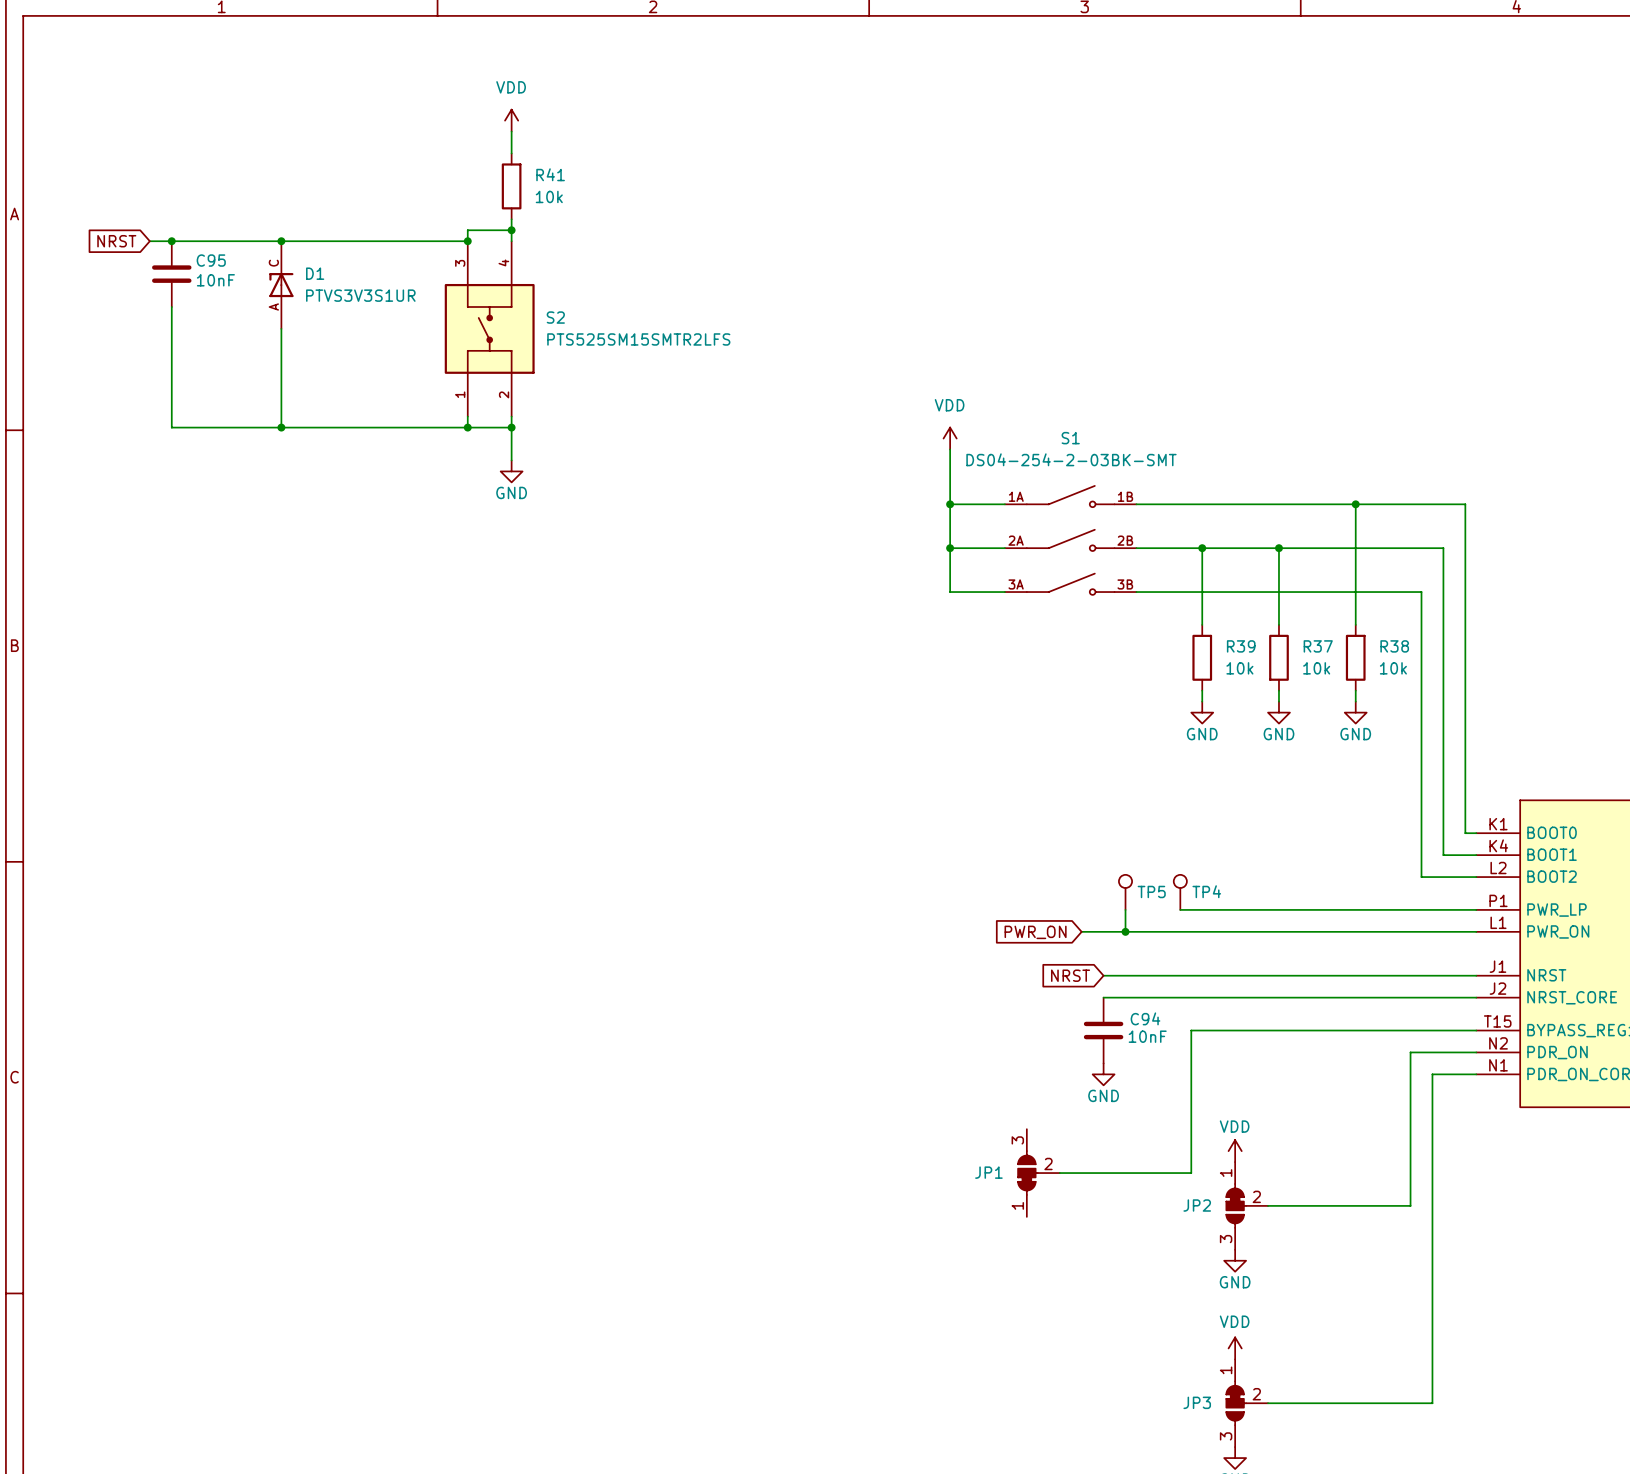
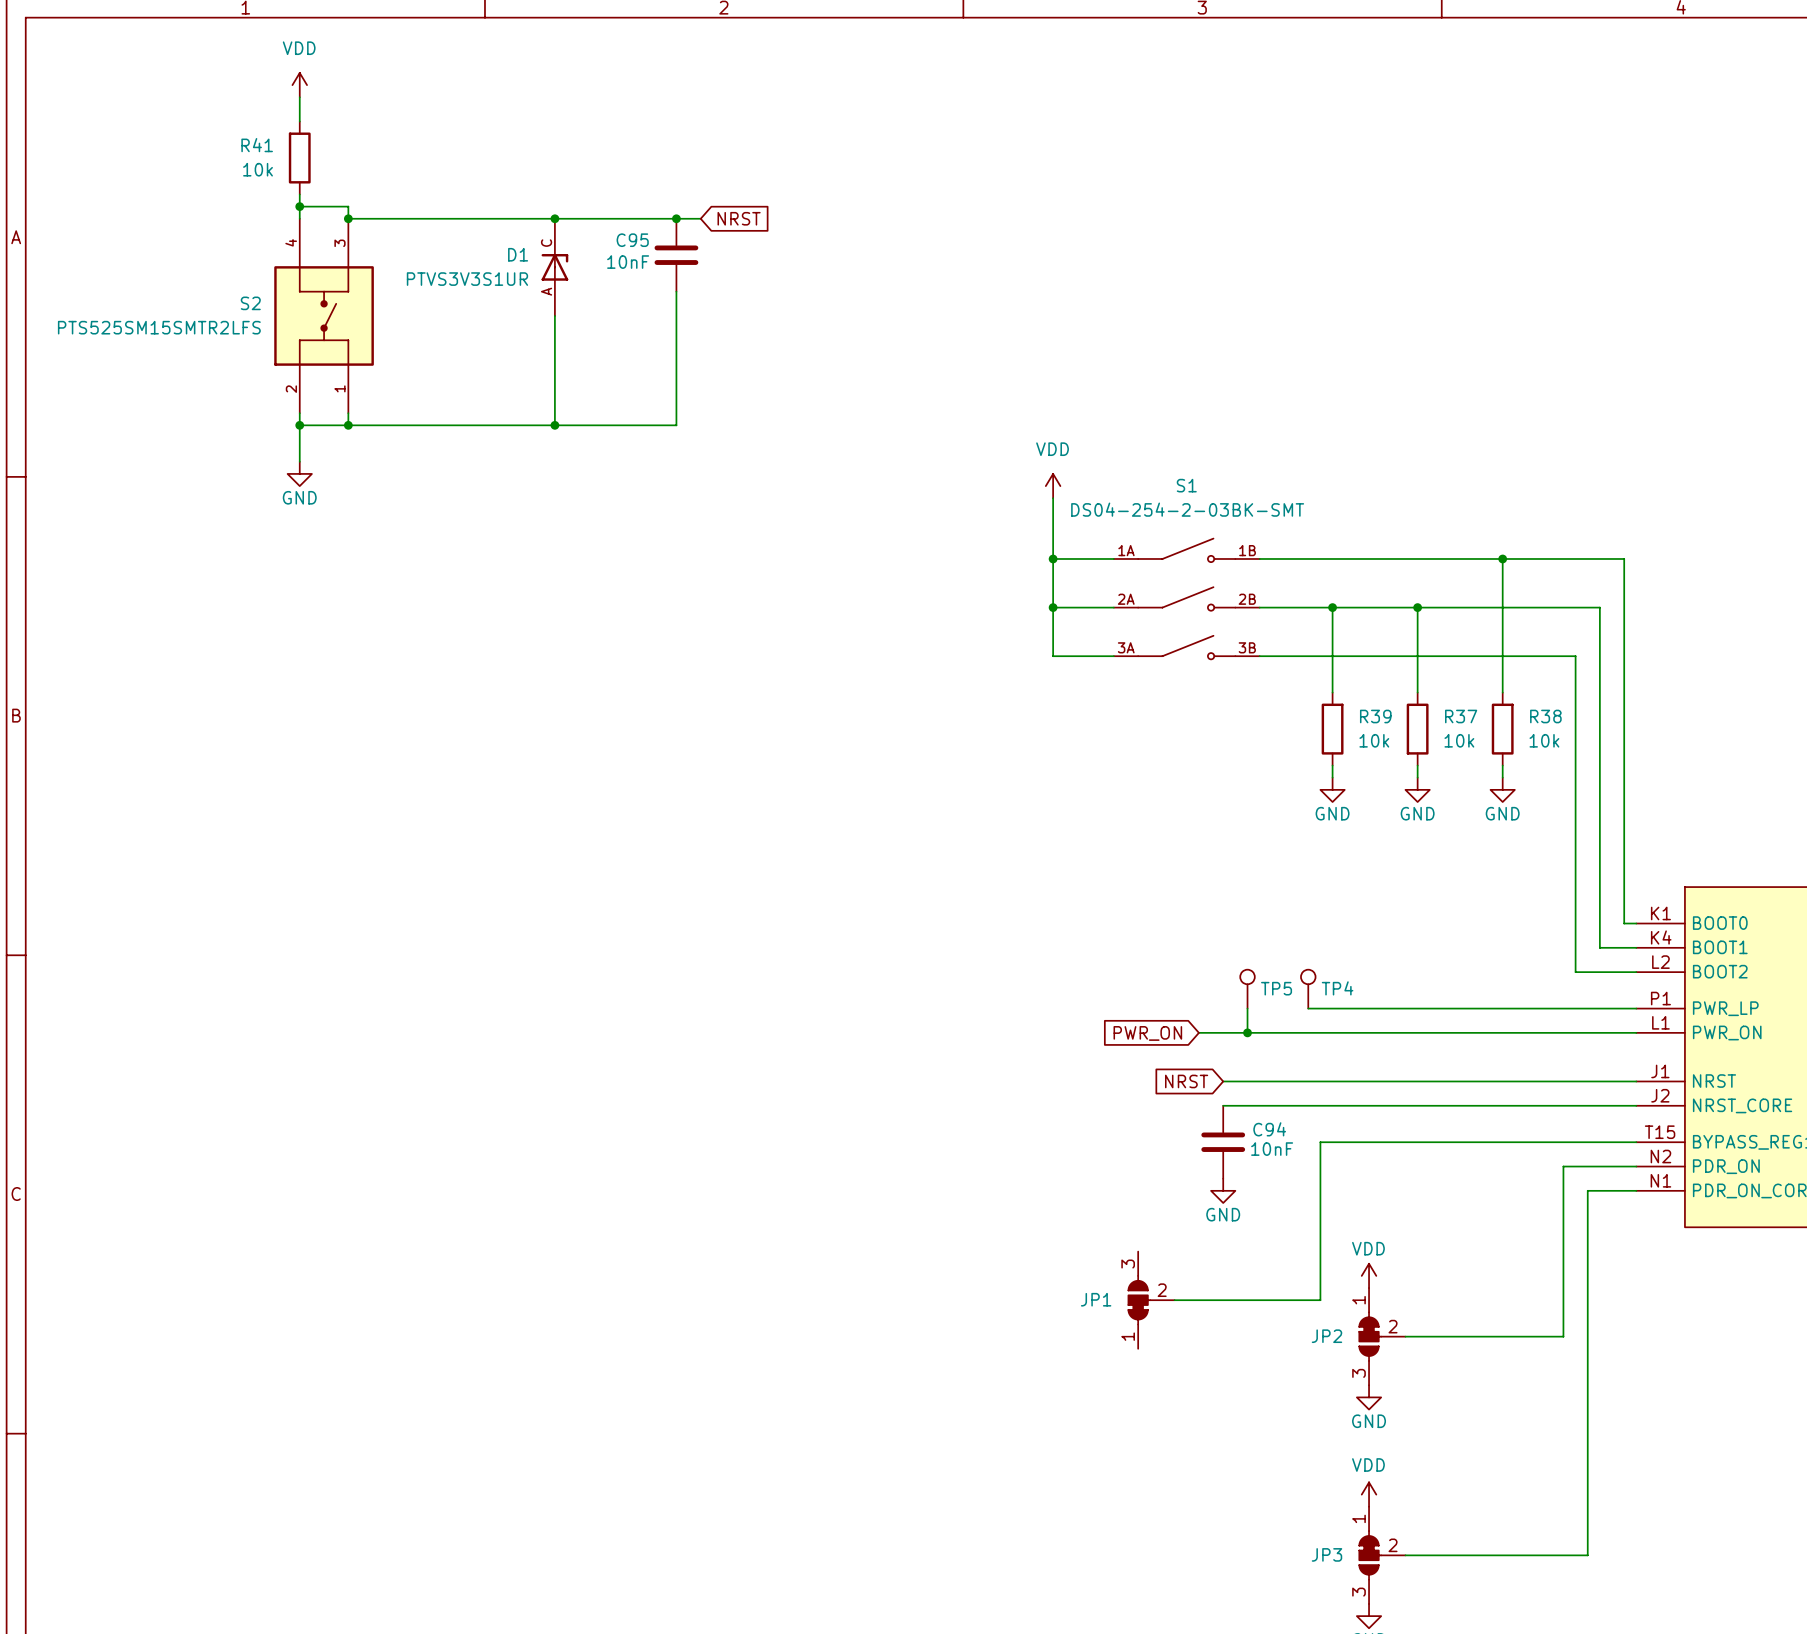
power symbol: none -> VDD (299, 85)
wire: none -> (299, 97) (299, 121)
power symbol: VDD (511, 120) -> none
wire: (511, 131) (511, 153) -> none
R41 name position: R41 (550, 174) -> R41 (257, 145)
wire: none -> (299, 194) (299, 218)
wire: none -> (299, 206) (348, 206) (348, 218) (700, 218)
junction: none -> (299, 206)
R41 position: (511, 186) -> (299, 158)
R41 value position: 10k (549, 196) -> 10k (258, 169)
junction: none -> (348, 218)
junction: none -> (554, 218)
junction: none -> (676, 218)
global label: none -> NRST (739, 218)
wire: (511, 219) (511, 241) -> none
wire: (511, 230) (467, 230) (467, 241) (149, 241) -> none
junction: (511, 230) -> none
global label: NRST (116, 241) -> none
junction: (171, 241) -> none
junction: (281, 241) -> none
junction: (467, 241) -> none
C95 name position: C95 (211, 260) -> C95 (632, 240)
wire: none -> (676, 291) (676, 425) (299, 425)
C95 position: (171, 274) -> (676, 255)
C95 value position: 10nF (215, 280) -> 10nF (628, 262)
D1 flip: as is (281, 285) -> left-right (554, 267)
D1 position: (281, 285) -> (554, 267)
wire: (171, 306) (171, 427) (511, 427) -> none
wire: (281, 328) (281, 427) -> none
S2 flip: as is (489, 328) -> left-right (324, 315)
S2 position: (489, 328) -> (324, 315)
wire: none -> (299, 413) (299, 461)
junction: none -> (299, 425)
junction: none -> (348, 425)
junction: none -> (554, 425)
wire: (467, 416) (467, 427) -> (348, 413) (348, 425)
wire: (511, 416) (511, 460) -> none
power symbol: none -> GND (299, 473)
junction: (281, 427) -> none
junction: (467, 427) -> none
junction: (511, 427) -> none
power symbol: GND (511, 471) -> none

